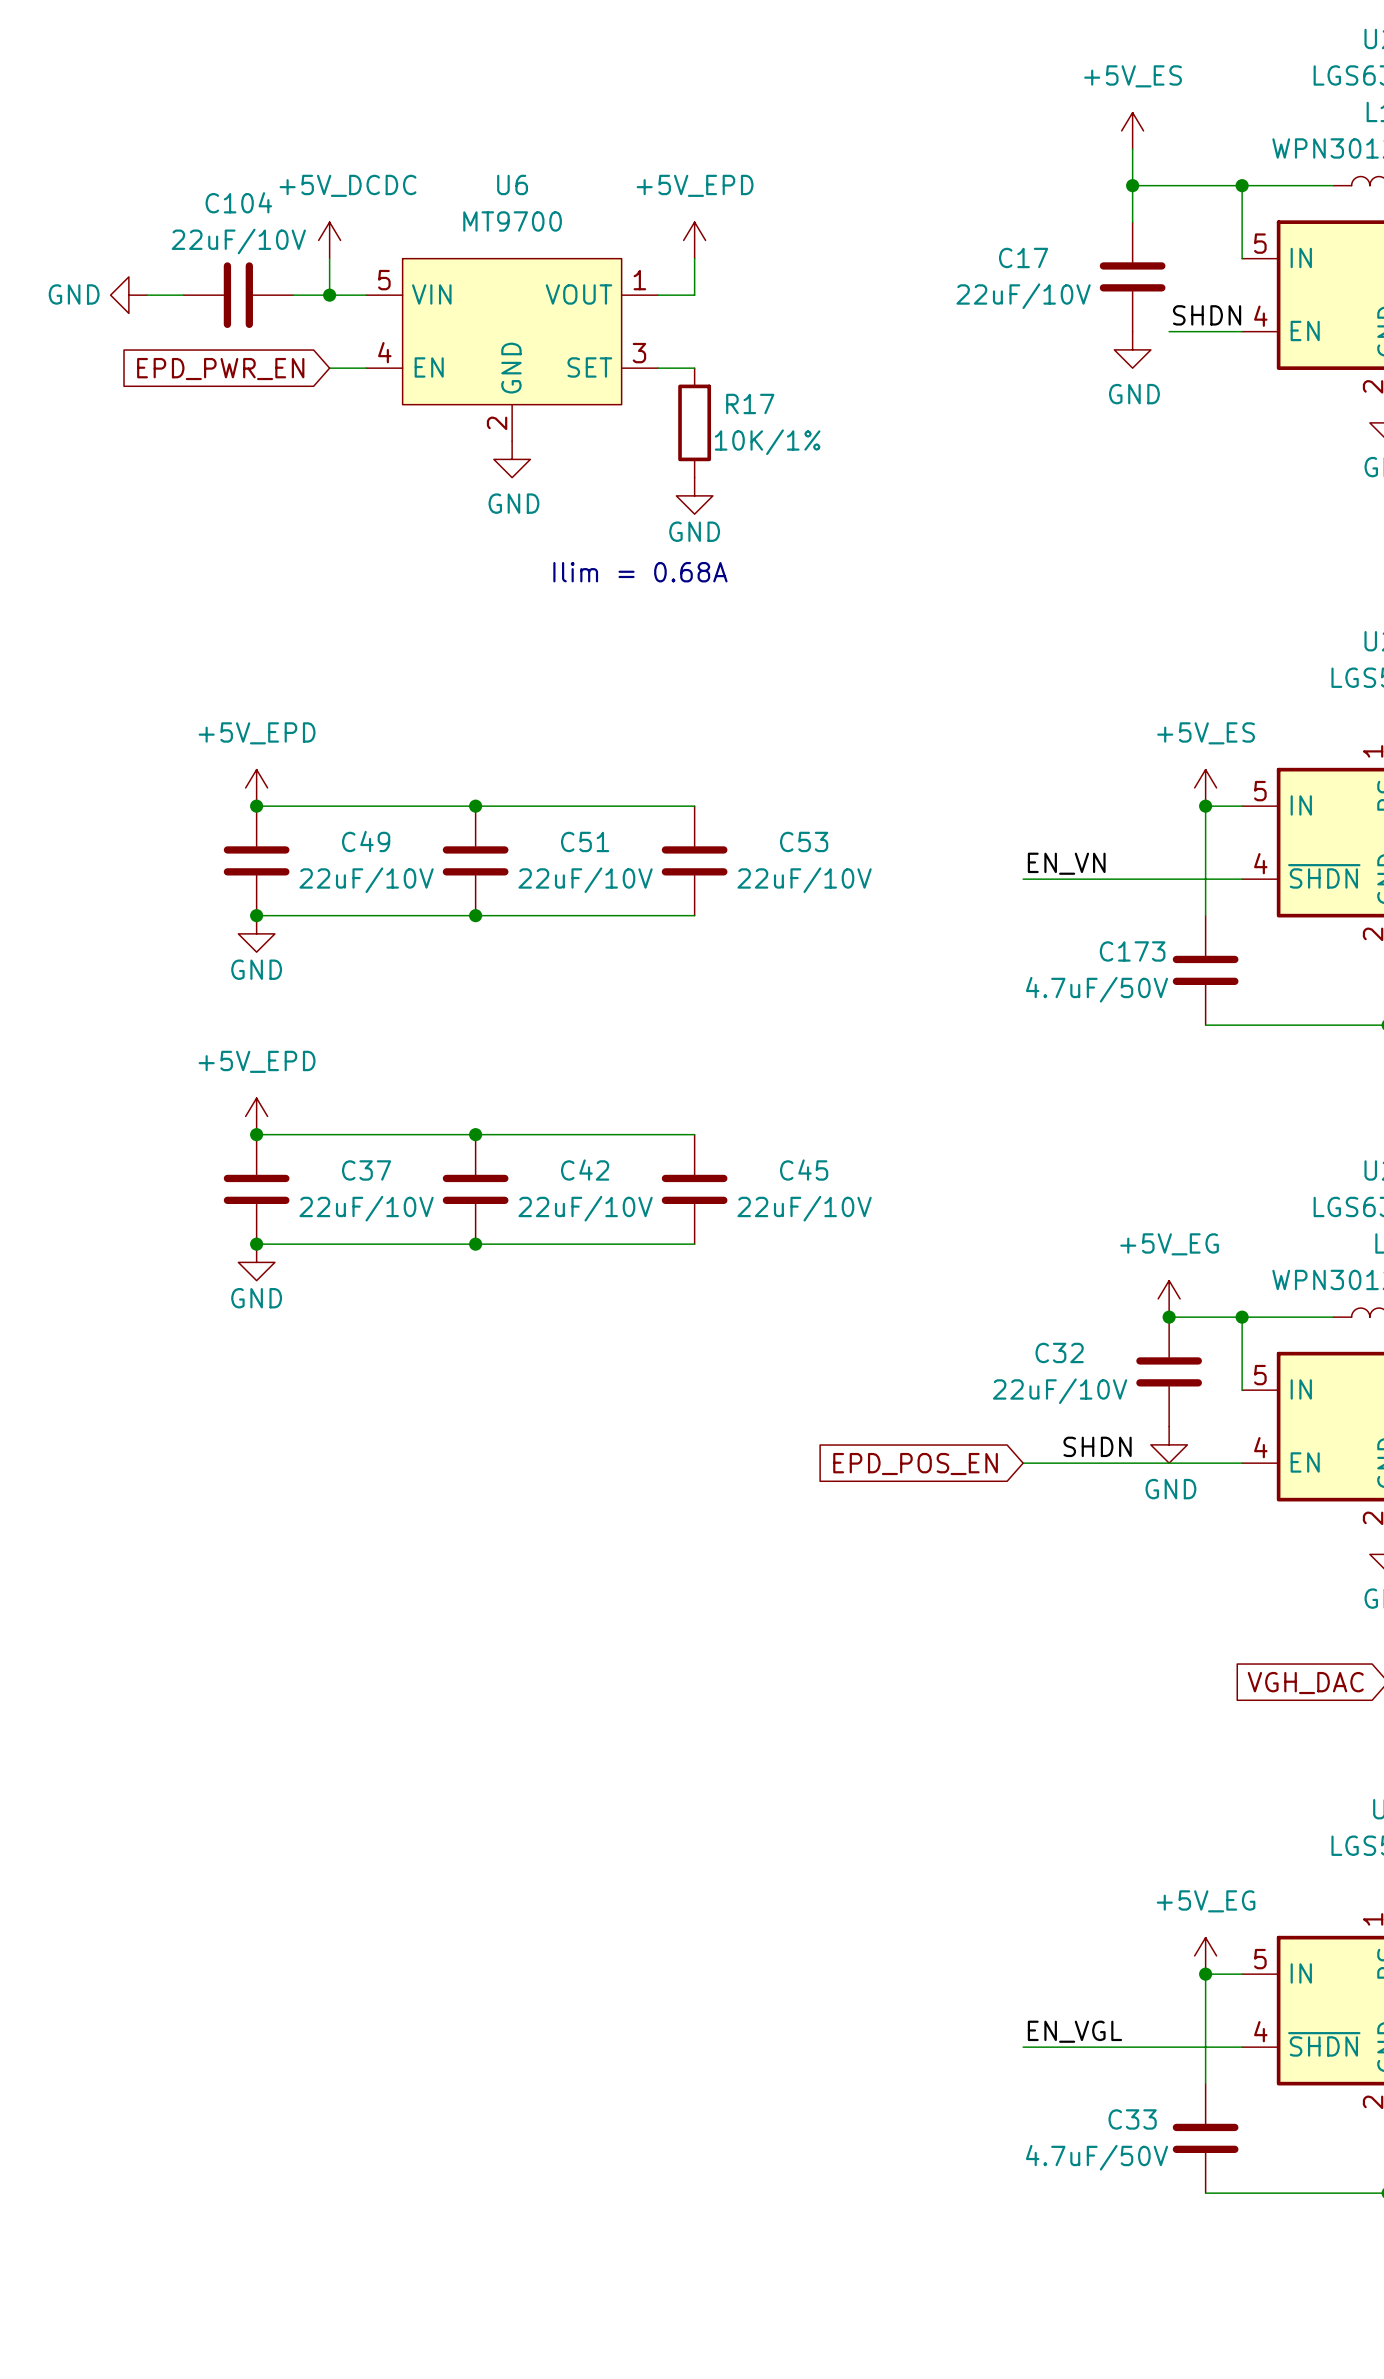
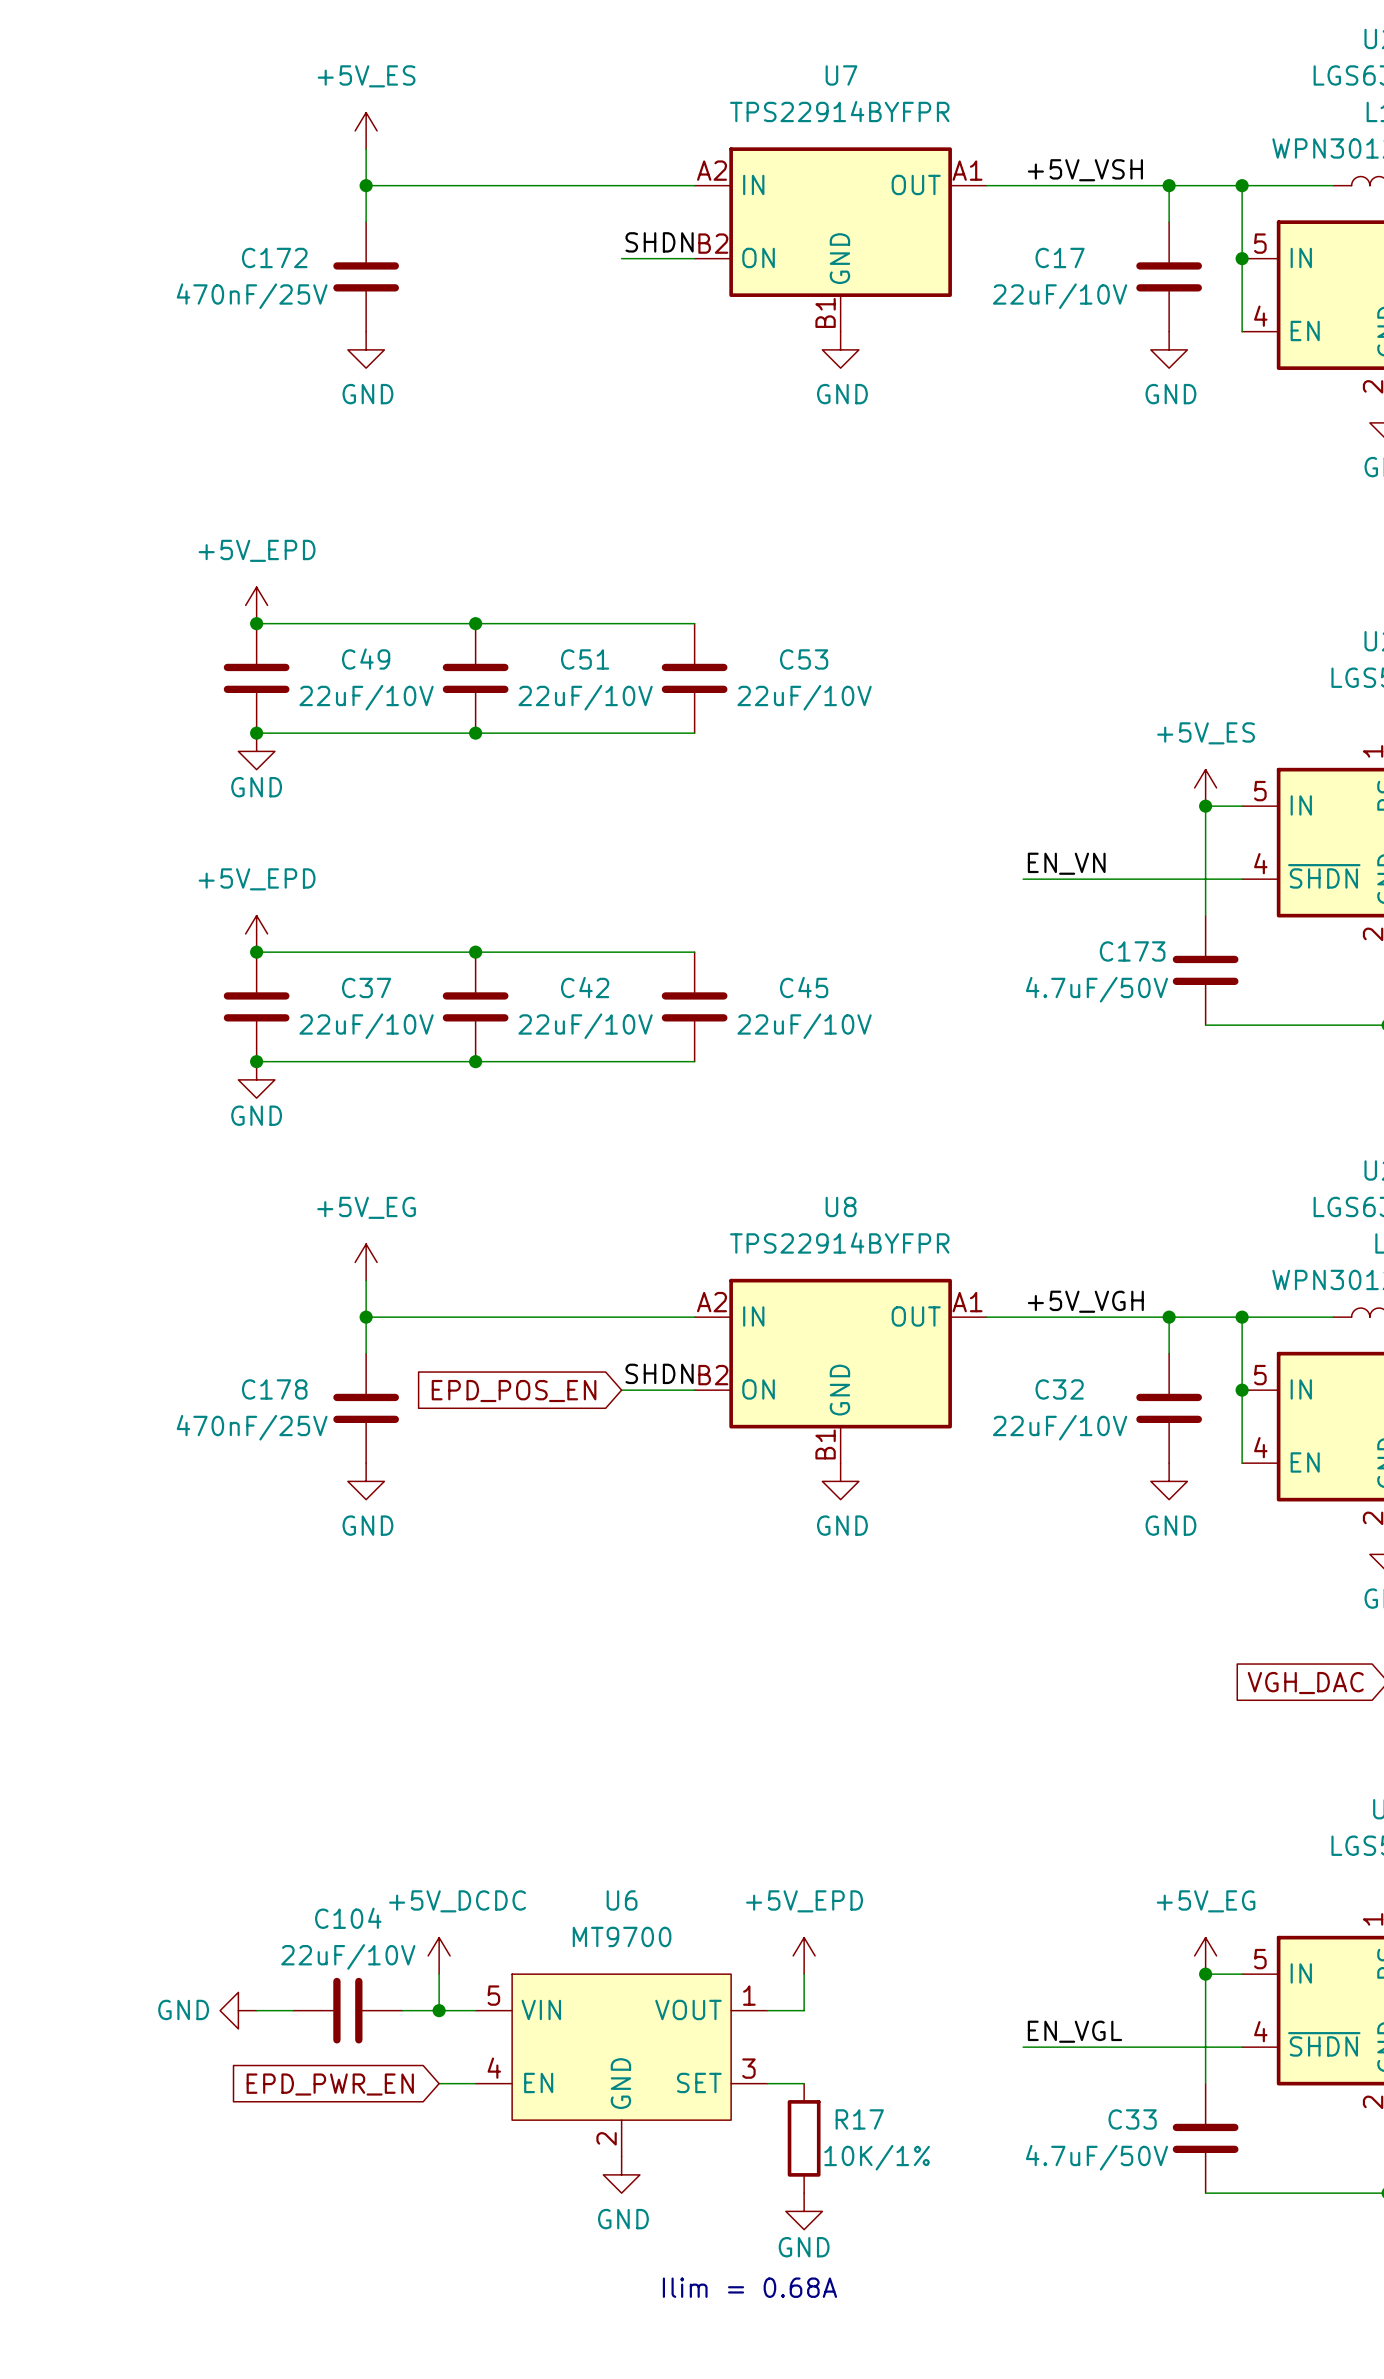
power symbol: none -> +5V_ES (366, 130)
power symbol: +5V_ES (1132, 130) -> none
wire: none -> (366, 149) (366, 222)
wire: (1132, 149) (1132, 222) -> none
label: none -> +5V_VSH (1085, 170)
wire: none -> (366, 185) (694, 185)
junction: none -> (366, 185)
wire: none -> (986, 185) (1132, 185)
junction position: (1132, 185) -> (1169, 185)
wire: none -> (1169, 185) (1169, 222)
U7: none -> TPS22914BYFPR (840, 239)
power symbol: +5V_DCDC (329, 240) -> none
power symbol: +5V_EPD (694, 240) -> none
label: none -> SHDN (659, 242)
wire: (329, 258) (329, 295) -> none
wire: (694, 258) (694, 295) (658, 295) -> (694, 258) (621, 258)
junction: none -> (1242, 258)
C172: none -> 470nF/25V (366, 276)
C17 position: (1132, 276) -> (1169, 276)
power symbol: GND (128, 295) -> none
wire: (147, 295) (183, 295) -> none
C104 position: (238, 295) -> (347, 2010)
wire: (293, 295) (366, 295) -> none
junction: (329, 295) -> none
label: SHDN (1207, 315) -> none
wire: (1169, 331) (1242, 331) -> (1242, 258) (1242, 331)
power symbol: none -> GND (366, 349)
U6 position: (512, 349) -> (621, 2065)
power symbol: none -> GND (840, 349)
power symbol position: GND (1132, 349) -> GND (1169, 349)
wire: (329, 368) (366, 368) -> none
wire: (658, 368) (694, 368) -> none
global label: EPD_PWR_EN (220, 369) -> none
R17 position: (694, 422) -> (804, 2138)
power symbol: GND (512, 459) -> none
power symbol: GND (694, 495) -> none
text: Ilim = 0.68A (640, 572) -> none
junction: none -> (256, 623)
junction: none -> (475, 623)
junction: none -> (256, 733)
junction: none -> (475, 733)
power symbol: none -> GND (256, 751)
power symbol position: +5V_EPD (256, 787) -> +5V_EPD (256, 605)
wire: (256, 806) (694, 806) -> (256, 623) (694, 623)
junction: (256, 806) -> none
junction: (475, 806) -> none
C49 position: (256, 860) -> (256, 678)
C51 position: (475, 860) -> (475, 678)
C53 position: (694, 860) -> (694, 678)
wire: (256, 915) (694, 915) -> (256, 733) (694, 733)
junction position: (256, 915) -> (256, 952)
junction position: (475, 915) -> (475, 952)
power symbol: GND (256, 933) -> +5V_EPD (256, 933)
junction: none -> (256, 1061)
junction: none -> (475, 1061)
power symbol: none -> GND (256, 1079)
power symbol: +5V_EPD (256, 1116) -> none
wire: (256, 1134) (694, 1134) -> (256, 952) (694, 952)
junction: (256, 1134) -> none
junction: (475, 1134) -> none
C37 position: (256, 1189) -> (256, 1006)
C42 position: (475, 1189) -> (475, 1006)
C45 position: (694, 1189) -> (694, 1006)
wire: (256, 1244) (694, 1244) -> (256, 1061) (694, 1061)
junction: (256, 1244) -> none
junction: (475, 1244) -> none
power symbol: GND (256, 1262) -> none
power symbol: none -> +5V_EG (366, 1262)
wire: none -> (366, 1280) (366, 1353)
power symbol: +5V_EG (1169, 1298) -> none
label: none -> +5V_VGH (1085, 1301)
wire: none -> (366, 1317) (694, 1317)
junction: none -> (366, 1317)
wire: none -> (986, 1317) (1169, 1317) (1169, 1353)
U8: none -> TPS22914BYFPR (840, 1370)
C32 position: (1169, 1371) -> (1169, 1408)
label: none -> SHDN (659, 1373)
wire: none -> (621, 1390) (694, 1390)
junction: none -> (1242, 1390)
global label: none -> EPD_POS_EN (514, 1391)
C178: none -> 470nF/25V (366, 1408)
power symbol position: GND (1169, 1444) -> GND (1169, 1481)
label: SHDN (1097, 1446) -> none
wire: (1023, 1463) (1242, 1463) -> (1242, 1390) (1242, 1463)
global label: EPD_POS_EN (915, 1464) -> none
power symbol: none -> GND (366, 1481)
power symbol: none -> GND (840, 1481)
power symbol: none -> +5V_DCDC (439, 1955)
power symbol: none -> +5V_EPD (804, 1955)
wire: none -> (439, 1974) (439, 2010)
wire: none -> (804, 1974) (804, 2010) (767, 2010)
power symbol: none -> GND (238, 2010)
wire: none -> (256, 2010) (293, 2010)
wire: none -> (402, 2010) (475, 2010)
junction: none -> (439, 2010)
wire: none -> (439, 2083) (475, 2083)
wire: none -> (767, 2083) (804, 2083)
global label: none -> EPD_PWR_EN (330, 2084)
power symbol: none -> GND (621, 2174)
power symbol: none -> GND (804, 2211)
text: none -> Ilim = 0.68A (749, 2287)

